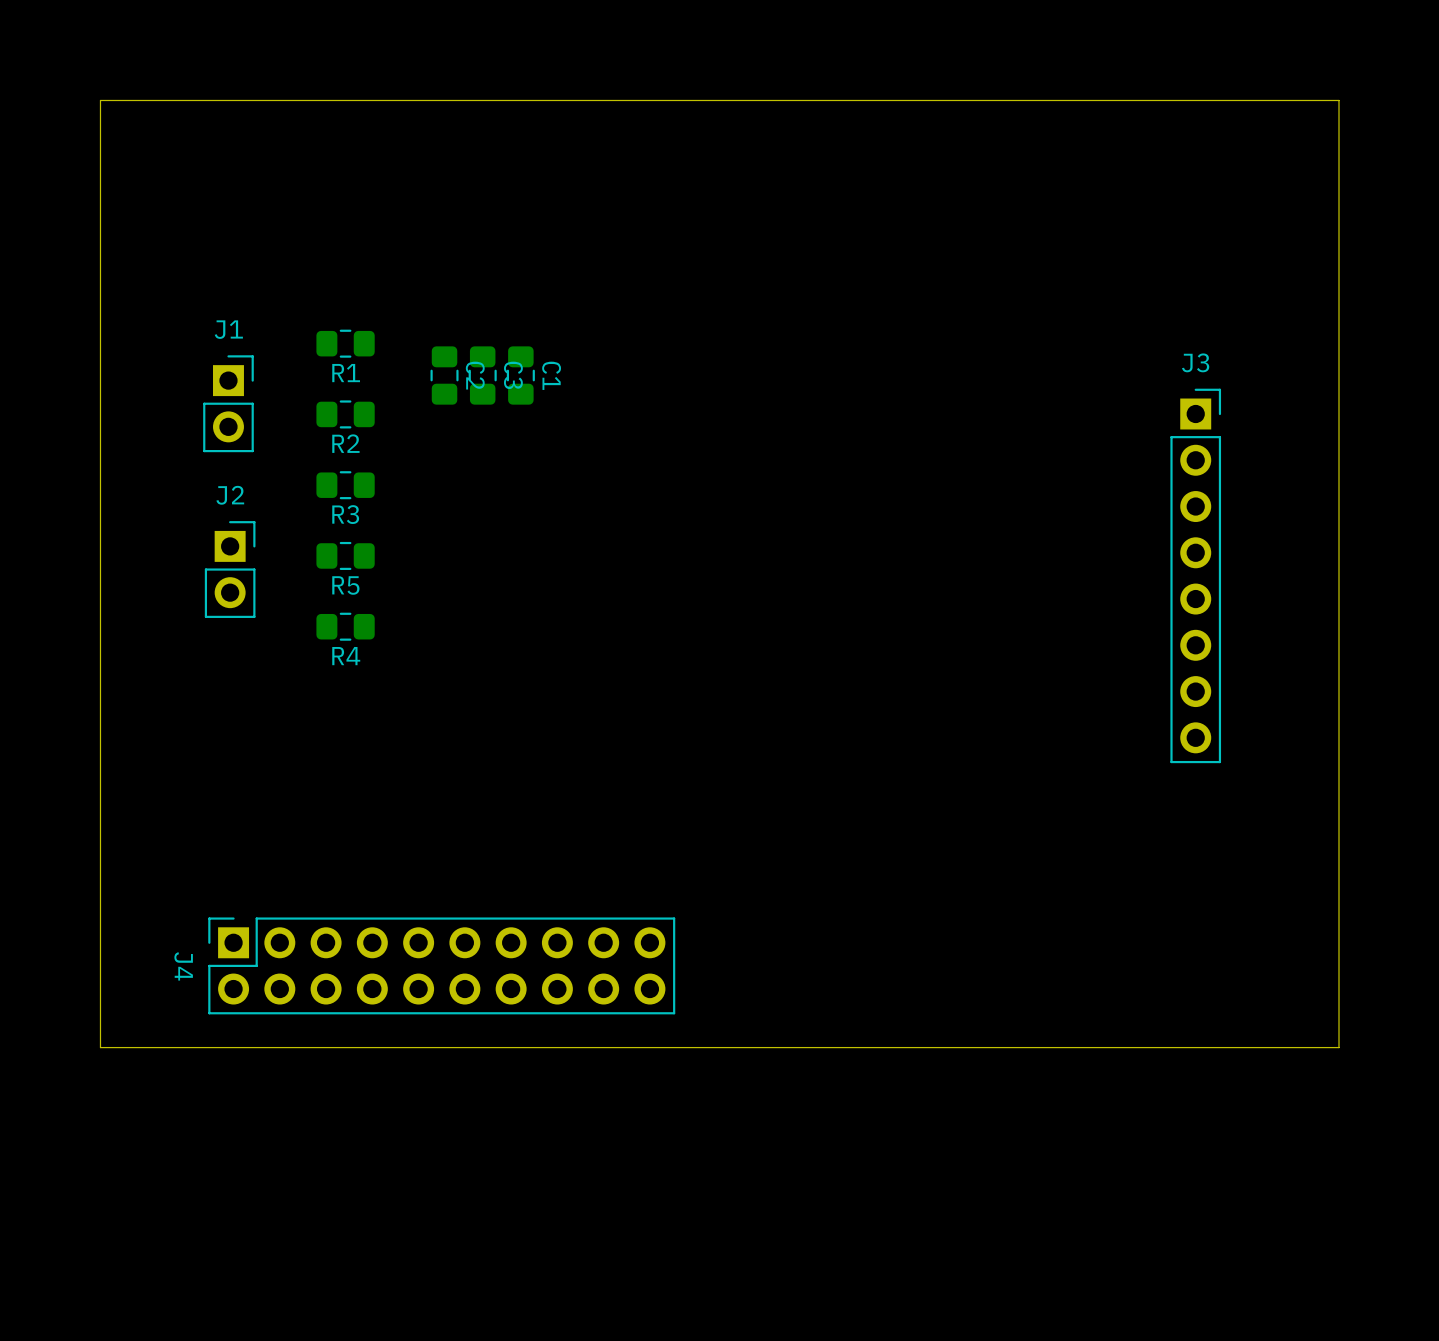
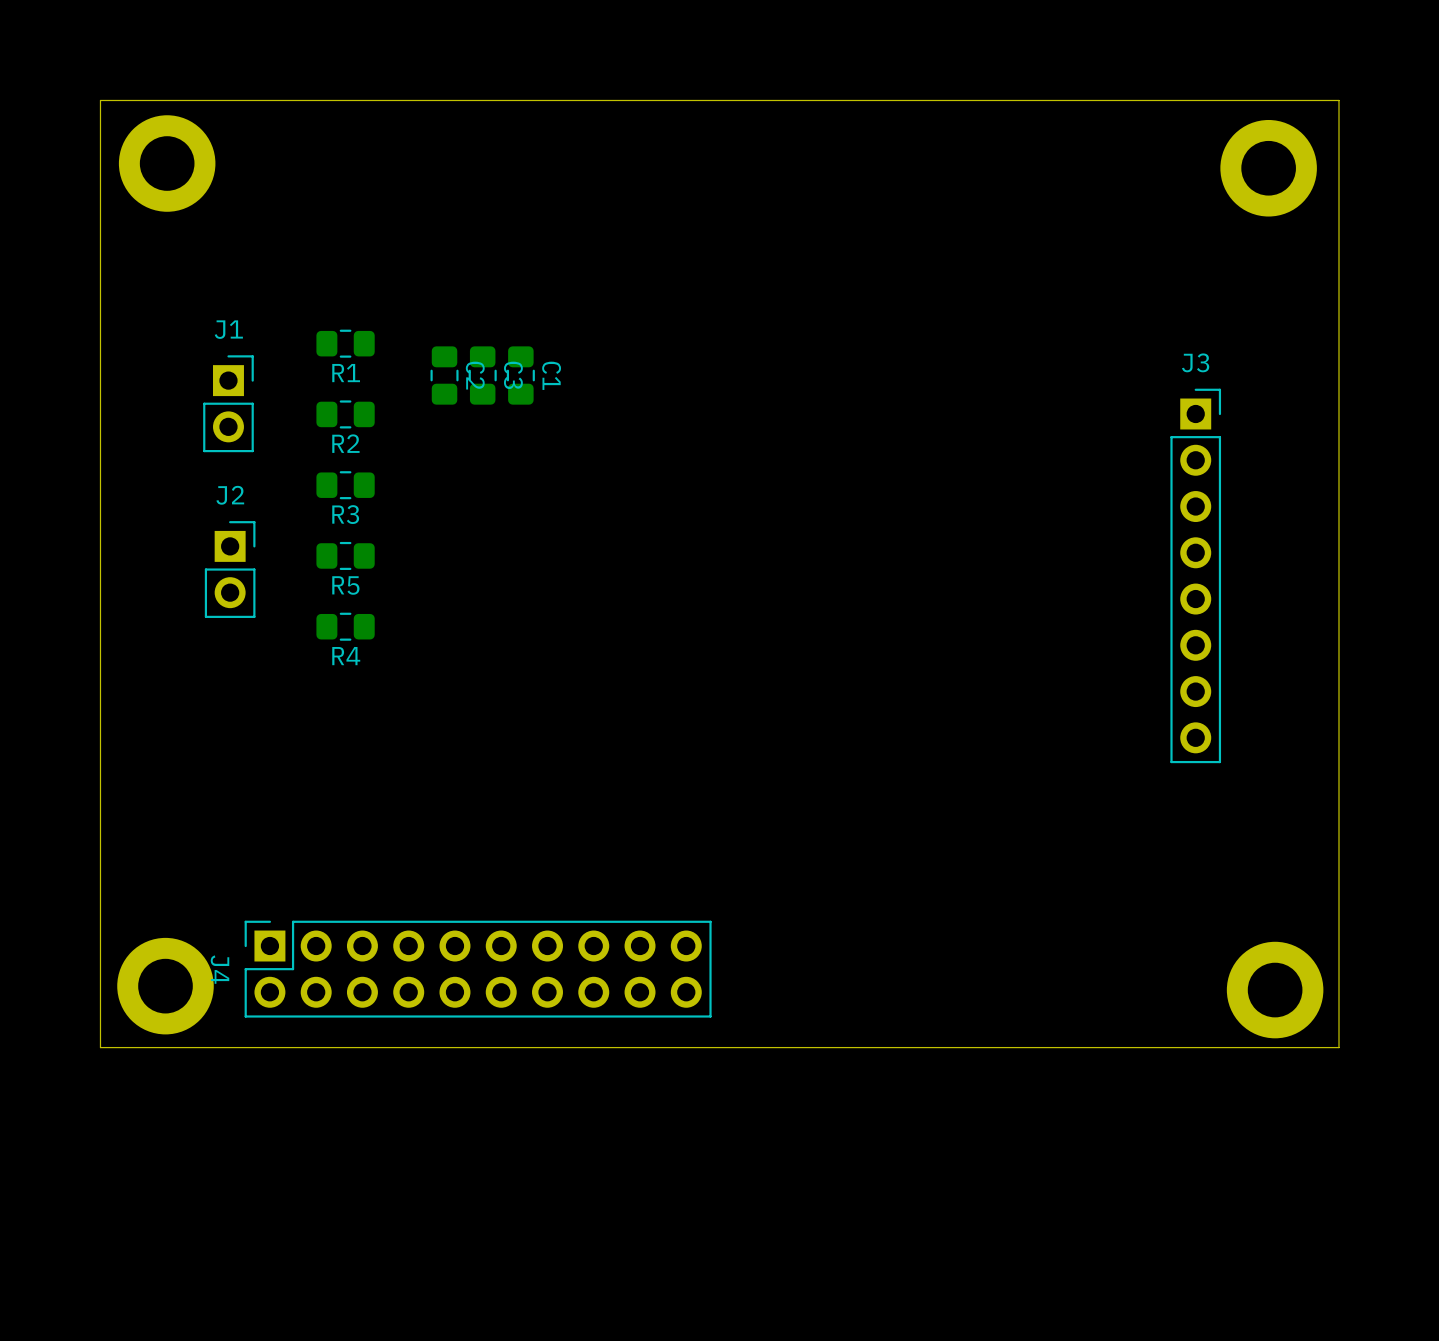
part: none -> (167, 163)
part: none -> (1268, 168)
J4 position: (441, 965) -> (478, 969)
part: none -> (165, 986)
part: none -> (1275, 990)

